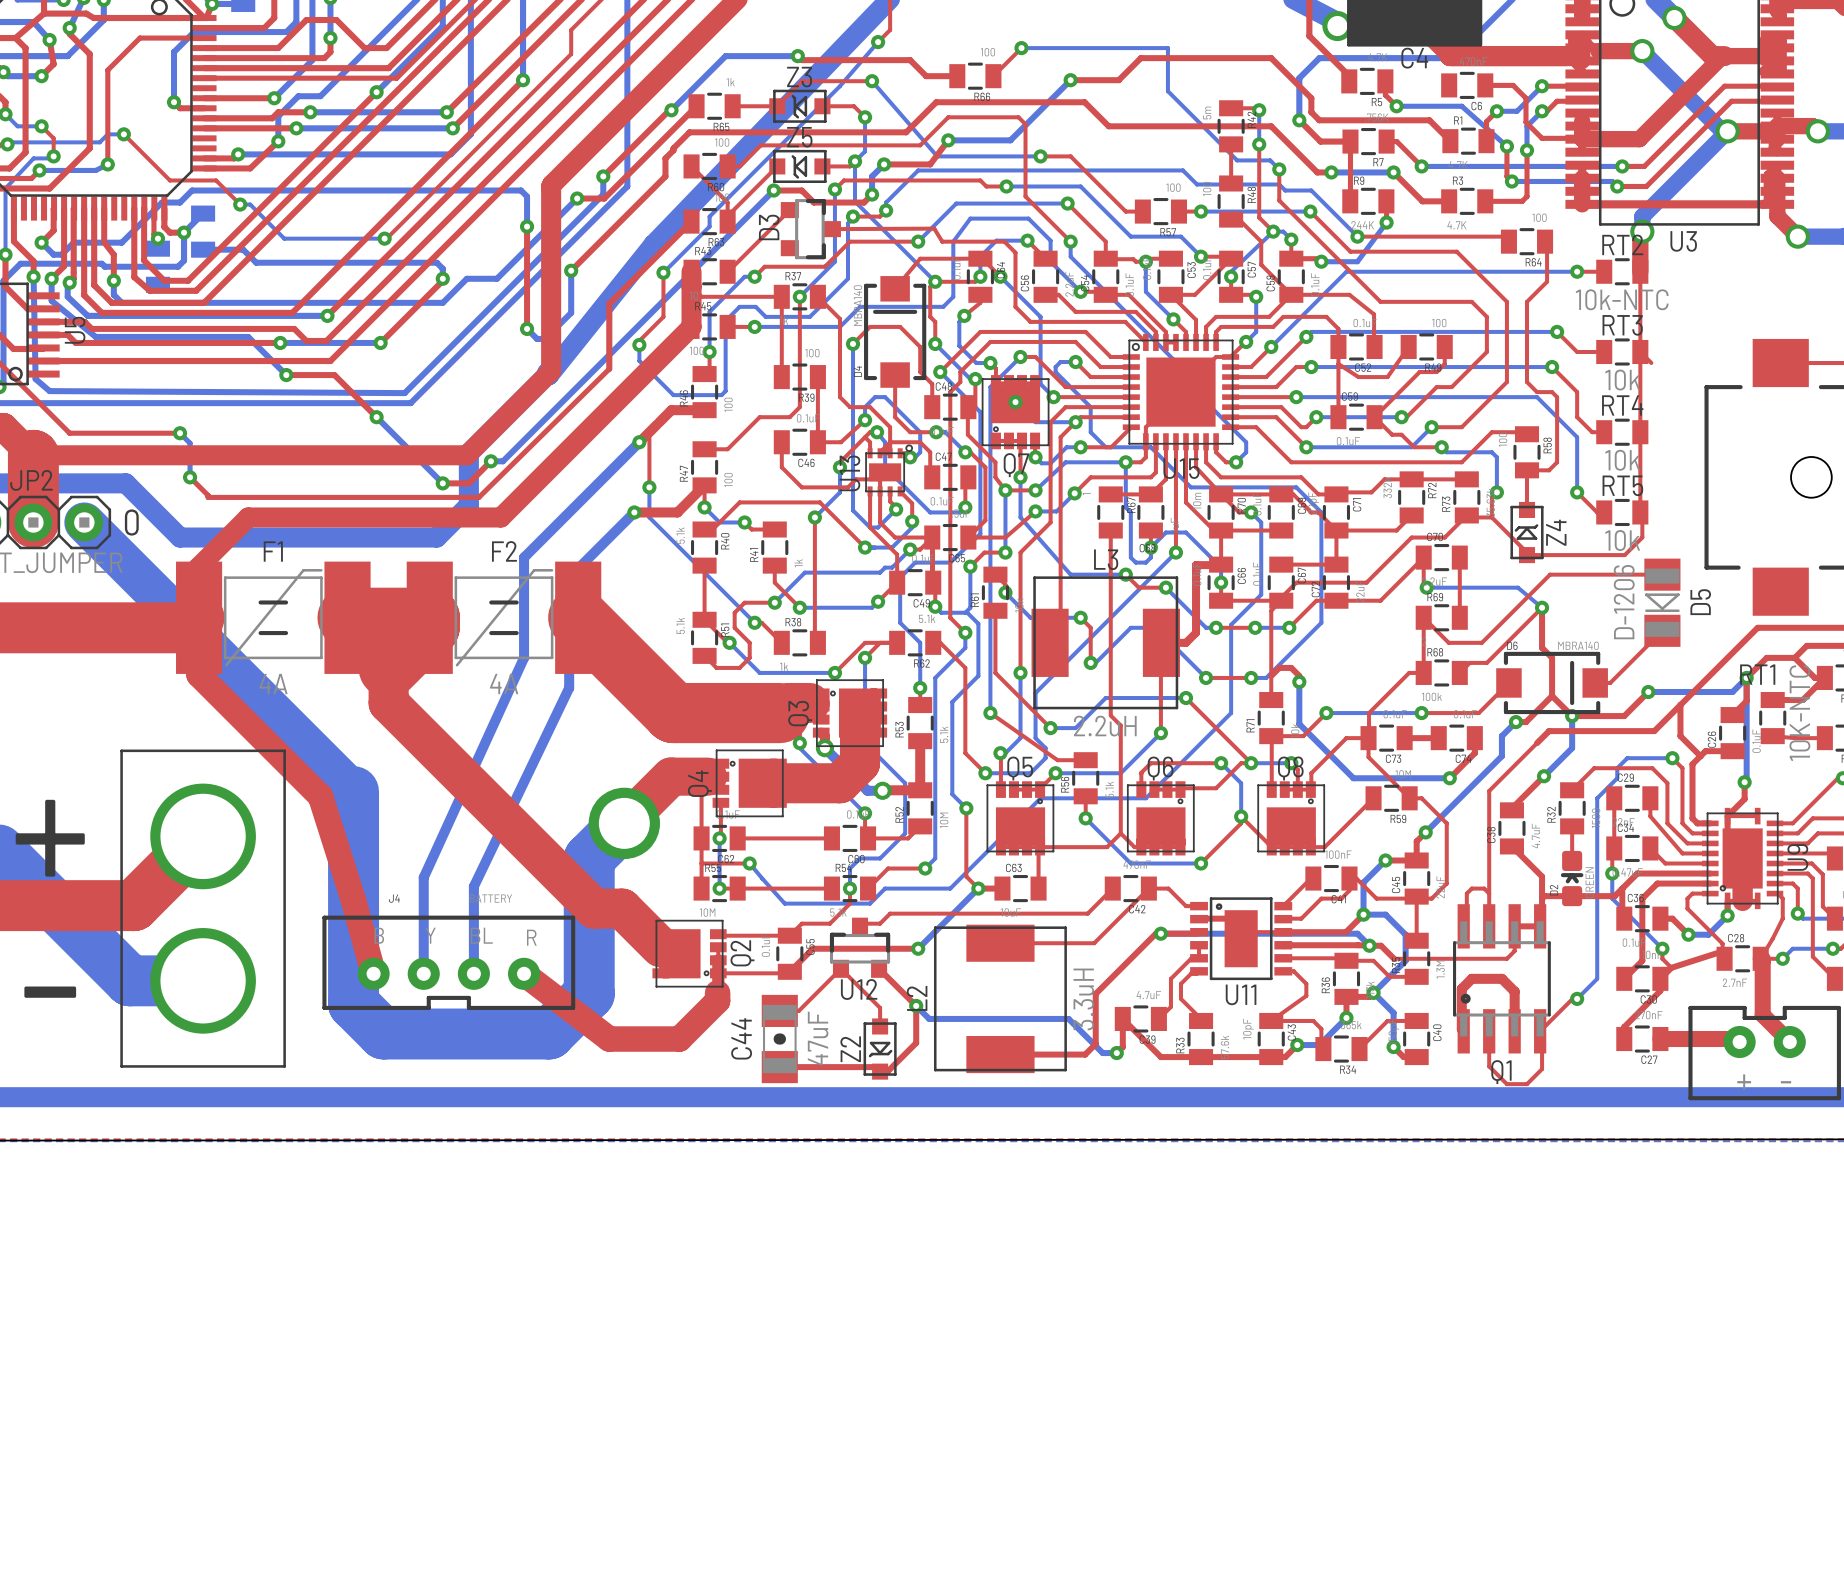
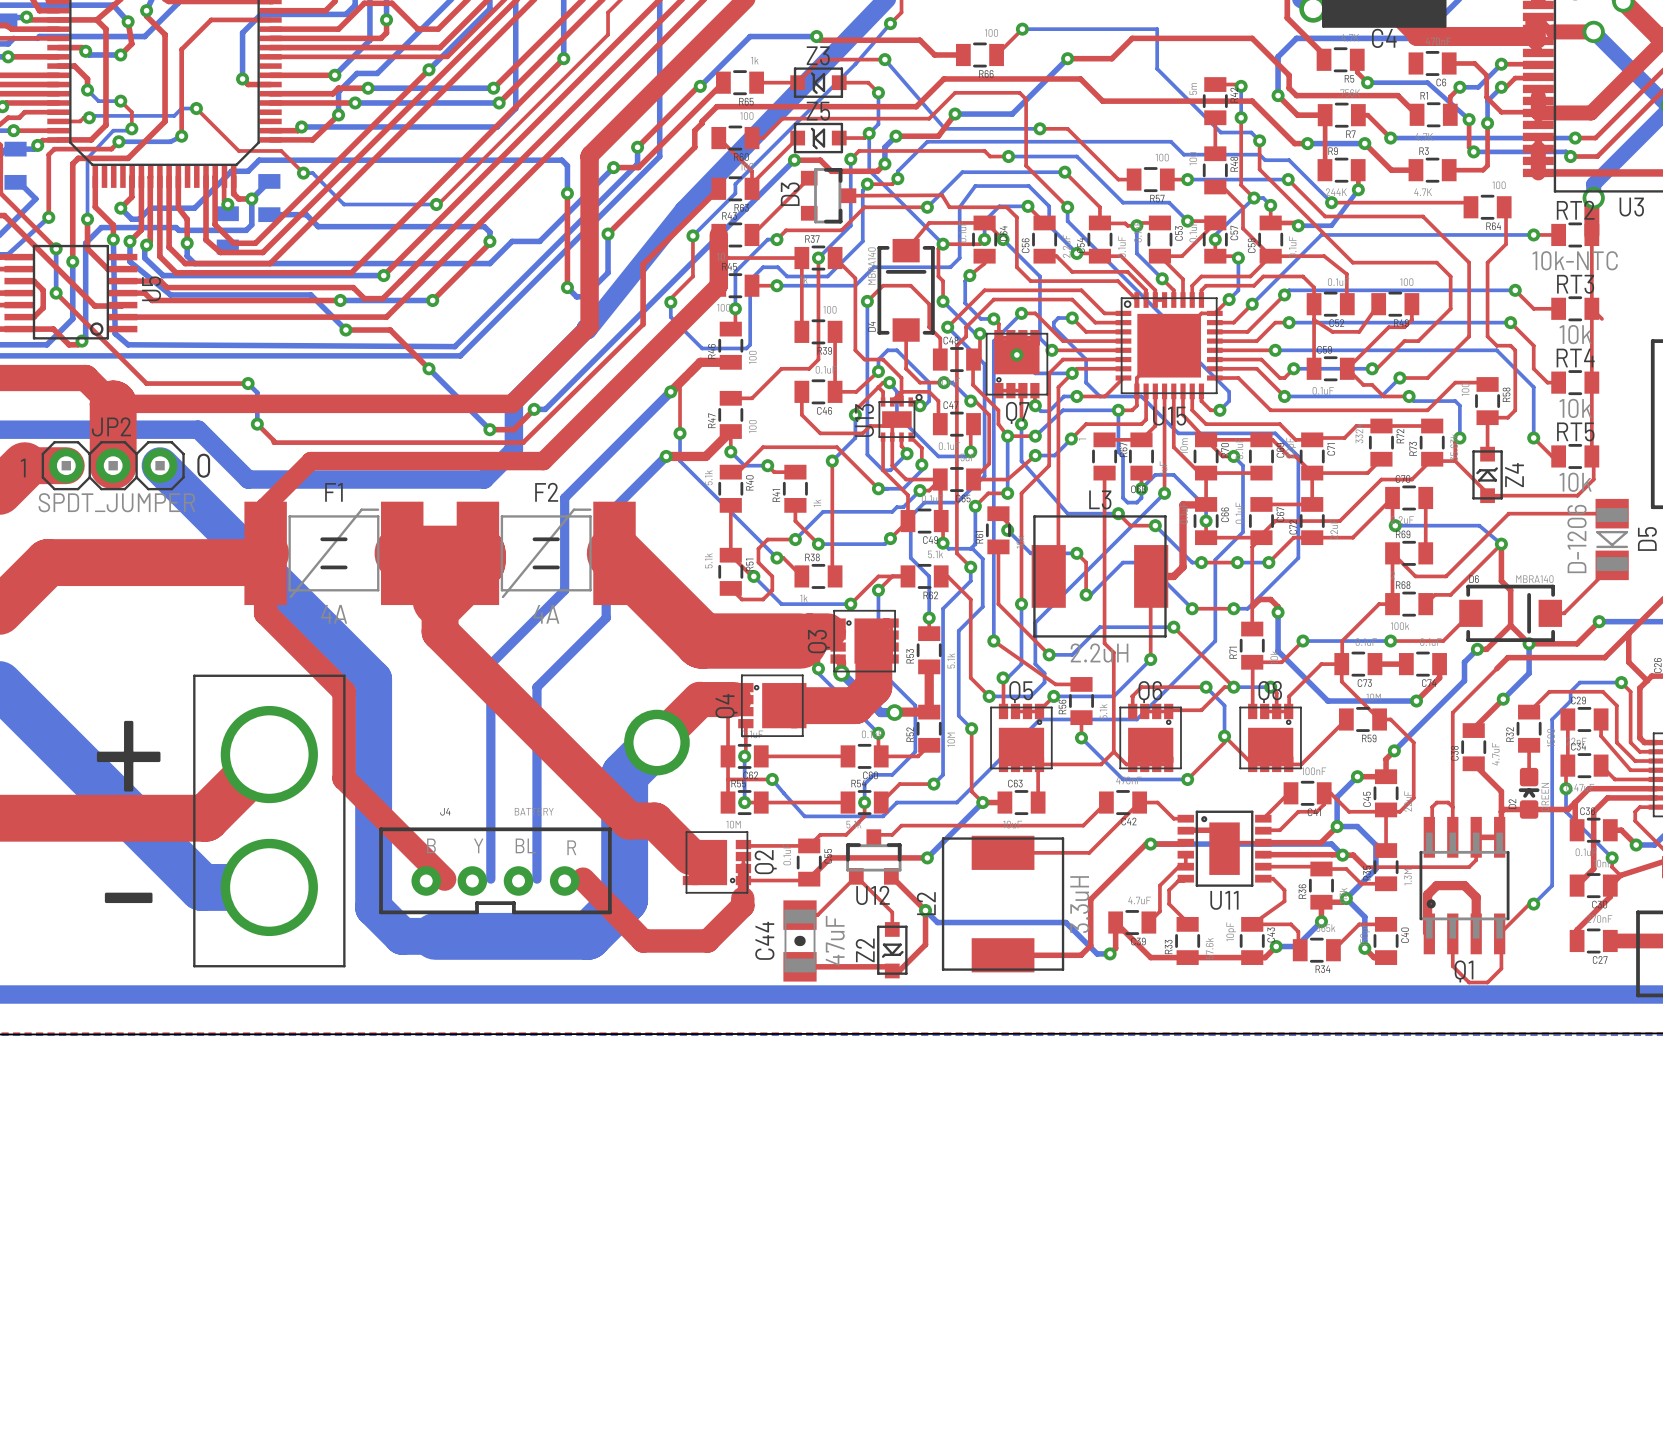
bottom track: (524, 657) (423, 877) (423, 973) -> (564, 590) (490, 664) (490, 879)
top track: (199, 674) (320, 796) (353, 900) (373, 973) -> (265, 605) (265, 613) (344, 691) (344, 778) (444, 879)
bottom track: (569, 687) (473, 886) (473, 973) -> (606, 617) (536, 687) (536, 879)
bottom track: (316, 754) (353, 791) (353, 1003) (383, 1034) -> (373, 679) (373, 907) (402, 936) (435, 936)
top track: (524, 973) (609, 1039) -> (583, 879) (643, 940)

